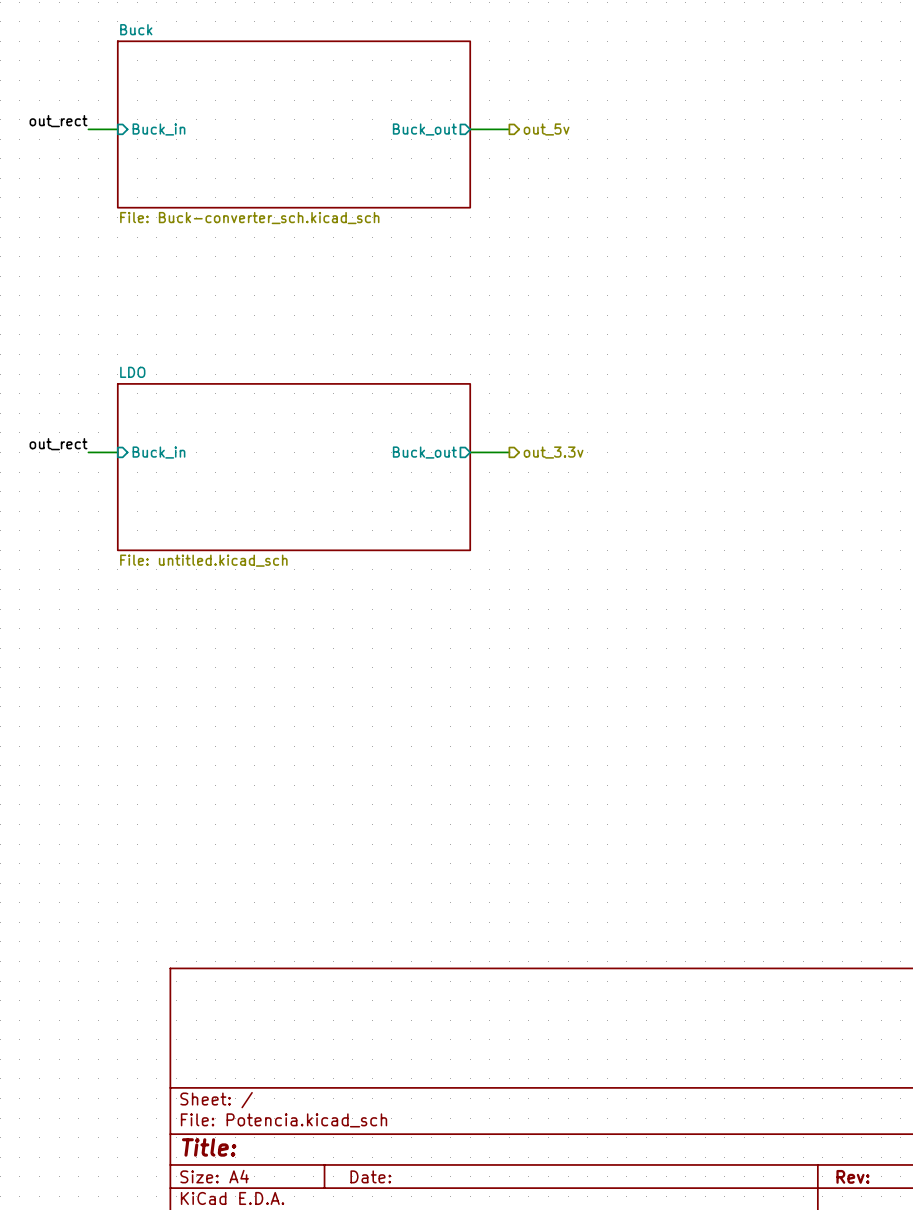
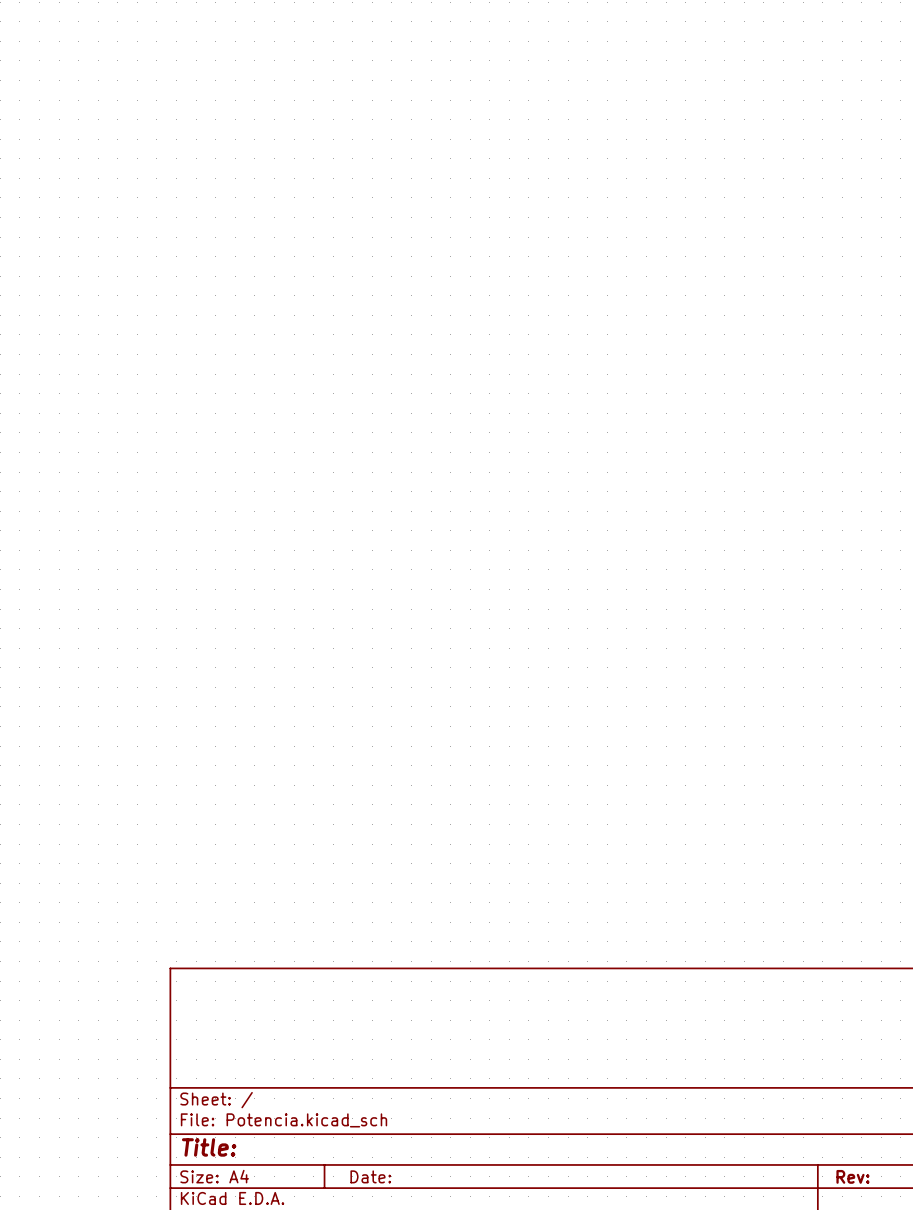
label: out_rect (58, 121) -> none
sheet Buck: File: Buck-converter_sch.kicad_sch (294, 124) -> none
wire: (88, 129) (117, 129) -> none
sheet pin: Buck_in (158, 129) -> none
sheet pin: Buck_out (424, 129) -> none
wire: (470, 129) (509, 129) -> none
hierarchical label: out_5v (546, 129) -> none
label: out_rect (58, 444) -> none
wire: (88, 452) (117, 452) -> none
sheet pin: Buck_in (158, 452) -> none
sheet pin: Buck_out (424, 452) -> none
wire: (470, 452) (509, 452) -> none
hierarchical label: out_3.3v (553, 452) -> none
sheet LDO: File: untitled.kicad_sch (294, 467) -> none

